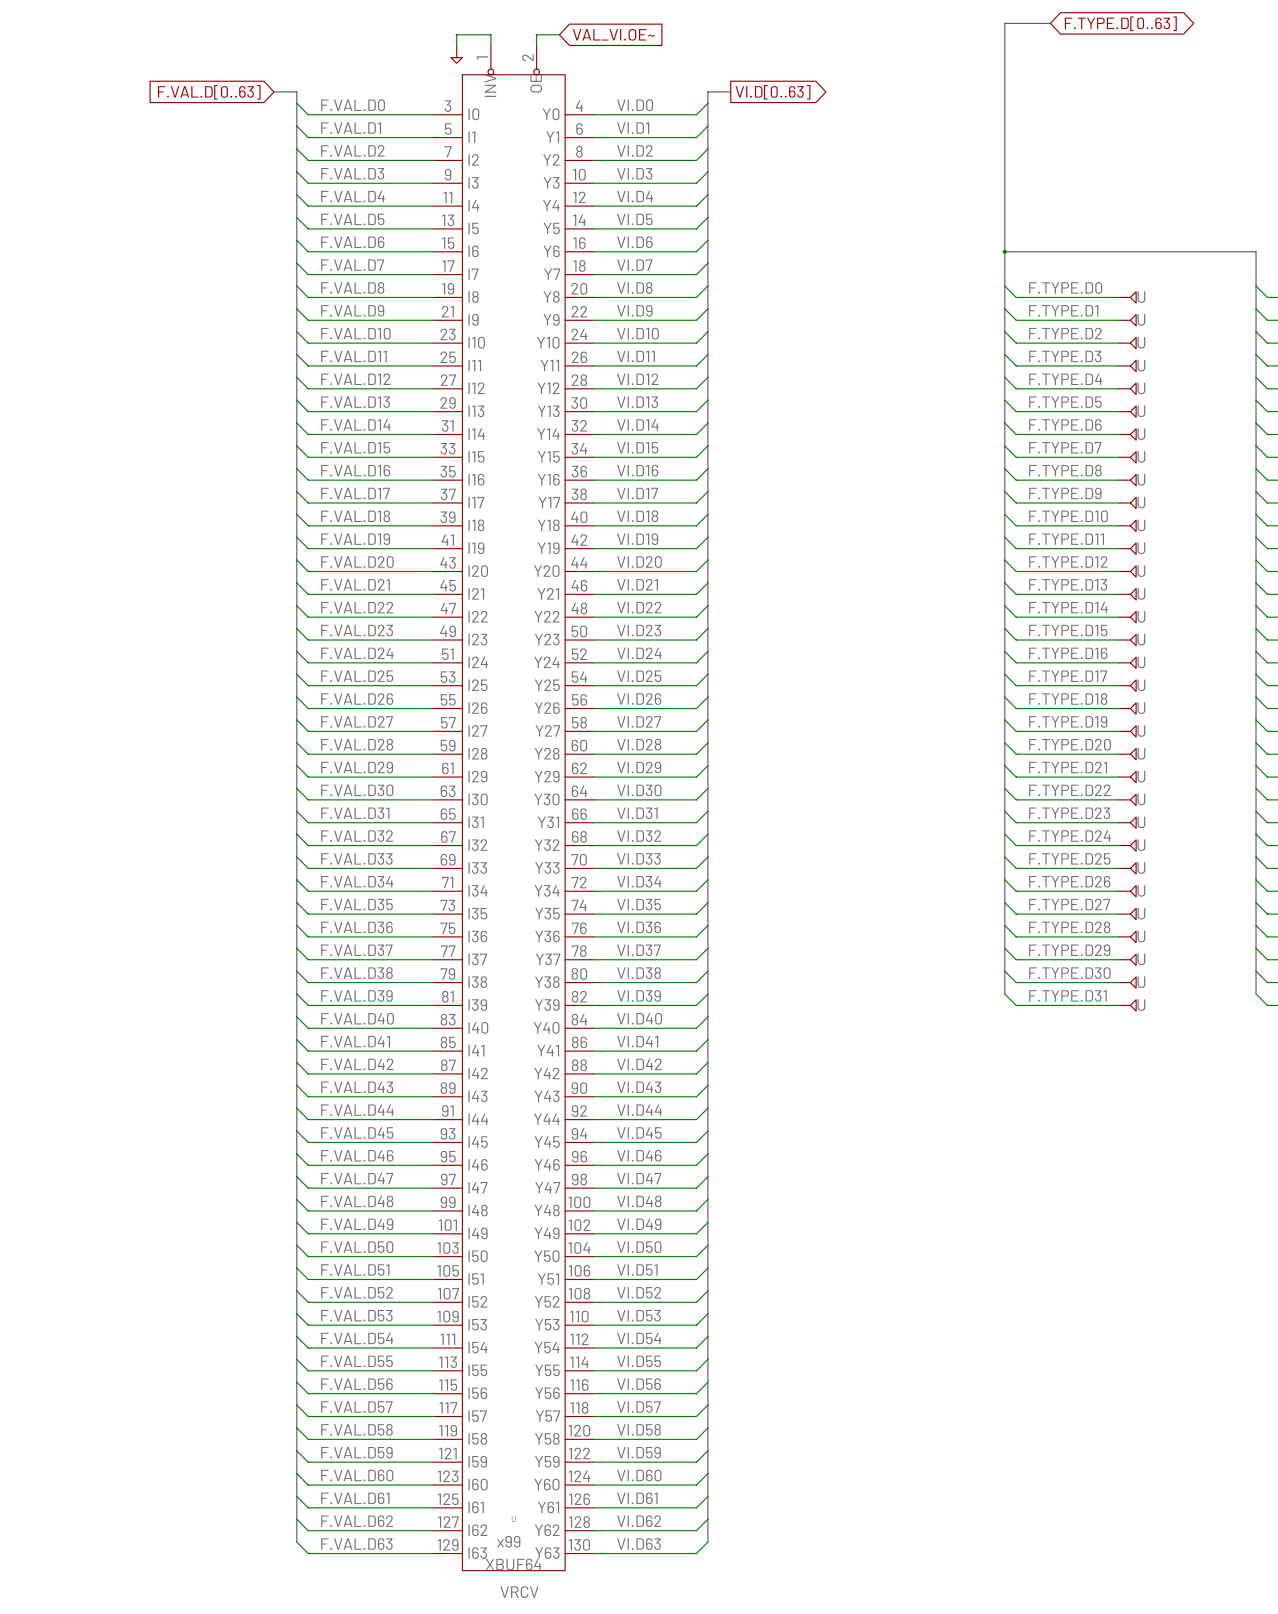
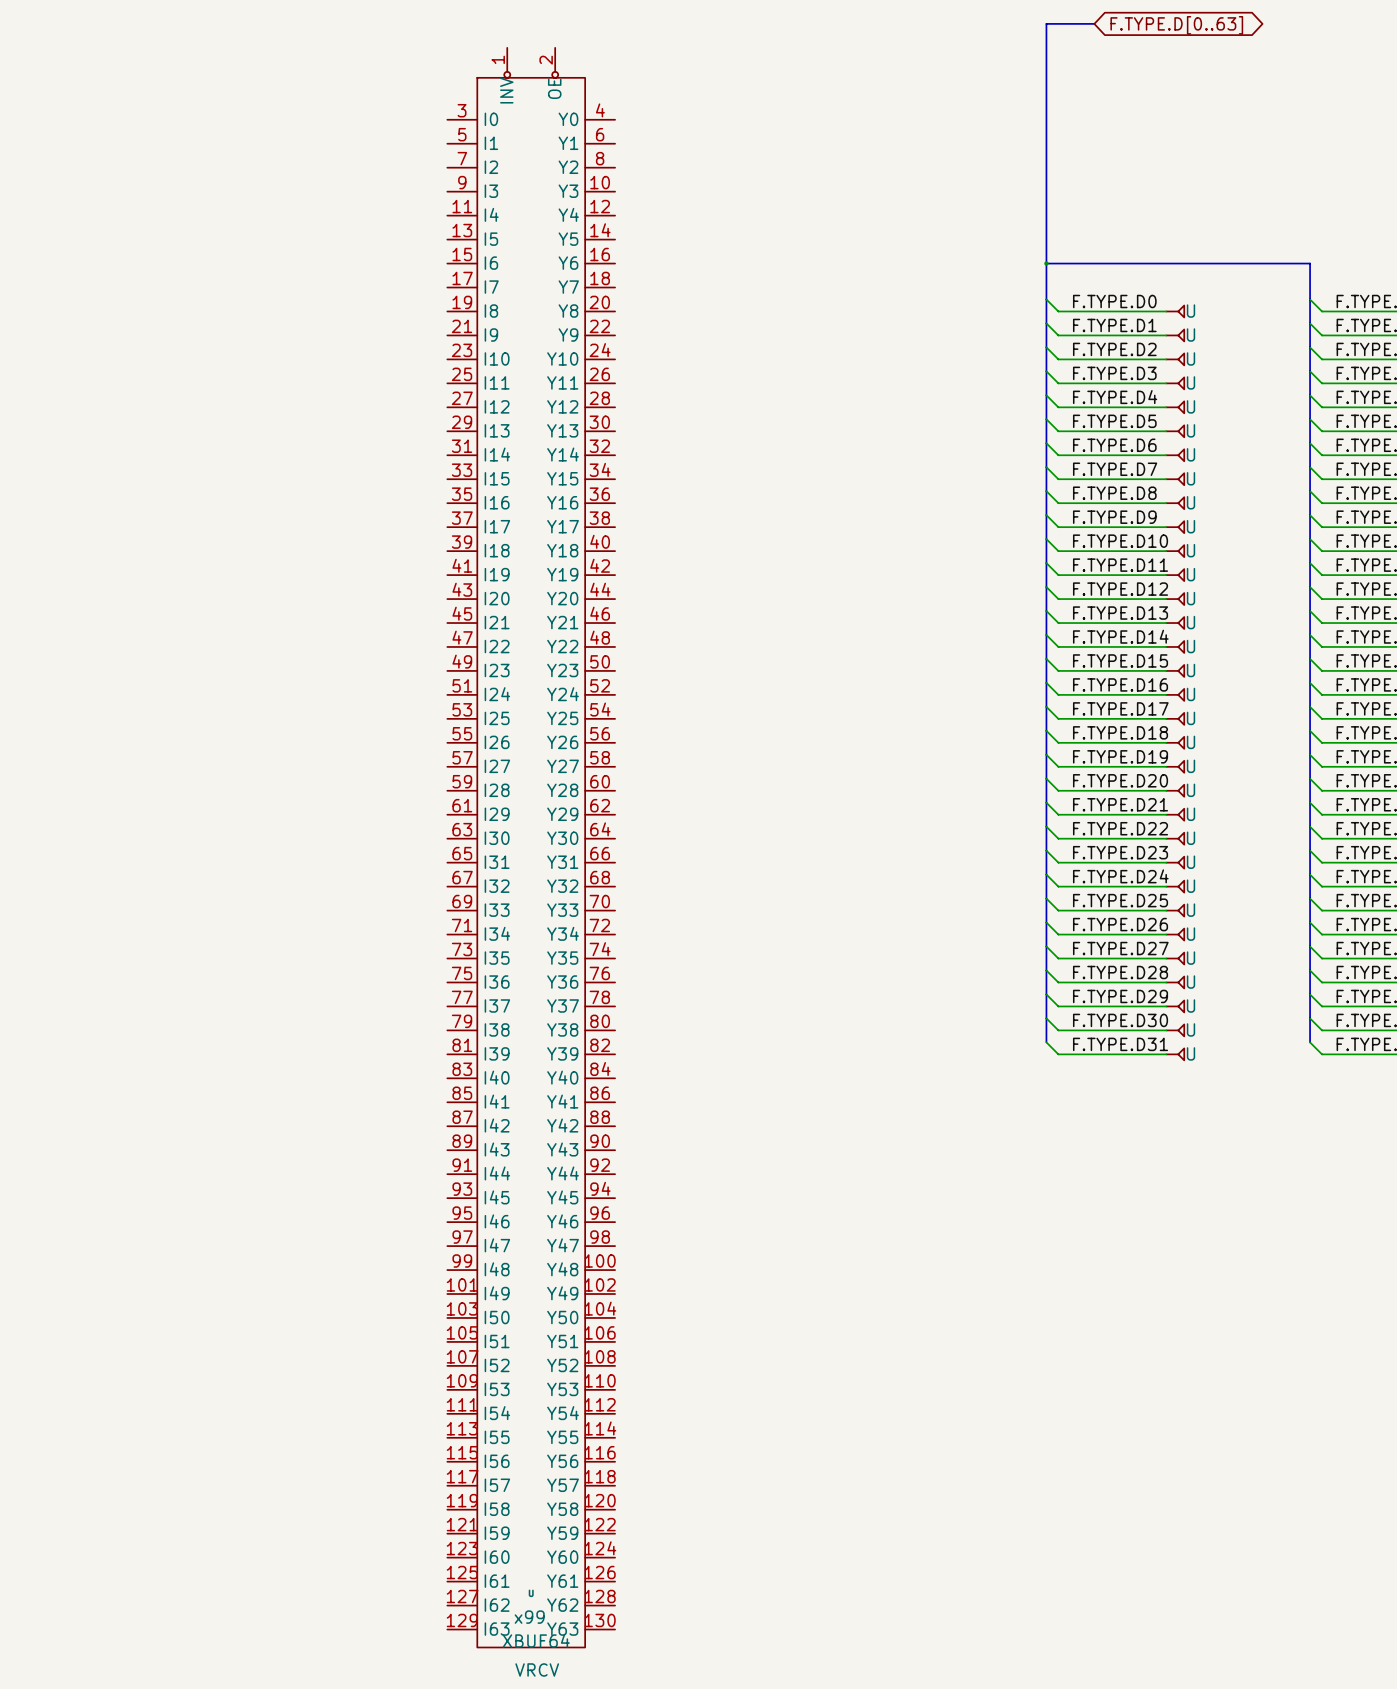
wire: (559, 34) (536, 34) (536, 46) -> none
global label: VAL_VI.OE~ (613, 34) -> none
wire: (456, 46) (456, 34) (490, 34) (490, 46) -> none
power symbol: (456, 54) -> none
bus: (273, 91) (296, 91) (296, 1542) -> none
bus: (730, 91) (707, 91) (707, 1542) -> none
global label: F.VAL.D[0..63] (209, 92) -> none
global label: VI.D[0..63] (773, 92) -> none
wire: (296, 103) (308, 114) (433, 114) -> none
wire: (707, 103) (696, 114) (593, 114) -> none
label: F.VAL.D0 (353, 105) -> none
label: VI.D0 (635, 105) -> none
wire: (296, 126) (308, 137) (433, 137) -> none
wire: (707, 126) (696, 137) (593, 137) -> none
label: F.VAL.D1 (351, 128) -> none
label: VI.D1 (633, 128) -> none
wire: (296, 148) (308, 160) (433, 160) -> none
wire: (707, 148) (696, 160) (593, 160) -> none
label: F.VAL.D2 (352, 150) -> none
label: VI.D2 (634, 150) -> none
wire: (296, 171) (308, 183) (433, 183) -> none
wire: (707, 171) (696, 183) (593, 183) -> none
label: F.VAL.D3 (352, 173) -> none
label: VI.D3 (634, 173) -> none
wire: (296, 194) (308, 206) (433, 206) -> none
wire: (707, 194) (696, 206) (593, 206) -> none
label: F.VAL.D4 (353, 196) -> none
label: VI.D4 (635, 196) -> none
wire: (296, 217) (308, 228) (433, 228) -> none
wire: (707, 217) (696, 228) (593, 228) -> none
label: F.VAL.D5 (352, 219) -> none
label: VI.D5 (634, 219) -> none
wire: (296, 240) (308, 251) (433, 251) -> none
wire: (707, 240) (696, 251) (593, 251) -> none
label: F.VAL.D6 (352, 242) -> none
label: VI.D6 (634, 242) -> none
wire: (296, 263) (308, 274) (433, 274) -> none
wire: (707, 263) (696, 274) (593, 274) -> none
label: F.VAL.D7 (352, 265) -> none
label: VI.D7 (634, 265) -> none
wire: (296, 286) (308, 297) (433, 297) -> none
wire: (707, 286) (696, 297) (593, 297) -> none
label: F.VAL.D8 (352, 287) -> none
label: VI.D8 (634, 287) -> none
wire: (296, 308) (308, 320) (433, 320) -> none
wire: (707, 308) (696, 320) (593, 320) -> none
label: F.VAL.D9 (352, 310) -> none
label: VI.D9 (634, 310) -> none
wire: (296, 331) (308, 343) (433, 343) -> none
wire: (707, 331) (696, 343) (593, 343) -> none
label: F.VAL.D10 (355, 333) -> none
label: VI.D10 (637, 333) -> none
wire: (296, 354) (308, 365) (433, 365) -> none
wire: (707, 354) (696, 365) (593, 365) -> none
label: F.VAL.D11 (353, 356) -> none
label: VI.D11 (636, 356) -> none
wire: (296, 377) (308, 388) (433, 388) -> none
wire: (707, 377) (696, 388) (593, 388) -> none
label: F.VAL.D12 (355, 379) -> none
label: VI.D12 (637, 379) -> none
wire: (296, 400) (308, 411) (433, 411) -> none
wire: (707, 400) (696, 411) (593, 411) -> none
label: F.VAL.D13 (355, 402) -> none
label: VI.D13 (637, 402) -> none
wire: (296, 423) (308, 434) (433, 434) -> none
wire: (707, 423) (696, 434) (593, 434) -> none
label: F.VAL.D14 (355, 424) -> none
label: VI.D14 (637, 424) -> none
wire: (296, 445) (308, 457) (433, 457) -> none
wire: (707, 445) (696, 457) (593, 457) -> none
label: F.VAL.D15 (355, 447) -> none
label: VI.D15 (637, 447) -> none
wire: (296, 468) (308, 480) (433, 480) -> none
wire: (707, 468) (696, 480) (593, 480) -> none
label: F.VAL.D16 (355, 470) -> none
label: VI.D16 (637, 470) -> none
wire: (296, 491) (308, 502) (433, 502) -> none
wire: (707, 491) (696, 502) (593, 502) -> none
label: F.VAL.D17 (355, 493) -> none
label: VI.D17 (637, 493) -> none
wire: (296, 514) (308, 525) (433, 525) -> none
wire: (707, 514) (696, 525) (593, 525) -> none
label: F.VAL.D18 (355, 516) -> none
label: VI.D18 (637, 516) -> none
wire: (296, 537) (308, 548) (433, 548) -> none
wire: (707, 537) (696, 548) (593, 548) -> none
label: F.VAL.D19 (355, 539) -> none
label: VI.D19 (637, 539) -> none
wire: (296, 560) (308, 571) (433, 571) -> none
wire: (707, 560) (696, 571) (593, 571) -> none
label: F.VAL.D20 (357, 562) -> none
label: VI.D20 (639, 562) -> none
wire: (296, 582) (308, 594) (433, 594) -> none
wire: (707, 582) (696, 594) (593, 594) -> none
label: F.VAL.D21 (355, 584) -> none
label: VI.D21 (637, 584) -> none
wire: (296, 605) (308, 617) (433, 617) -> none
wire: (707, 605) (696, 617) (593, 617) -> none
label: F.VAL.D22 (357, 607) -> none
label: VI.D22 (639, 607) -> none
wire: (296, 628) (308, 640) (433, 640) -> none
wire: (707, 628) (696, 640) (593, 640) -> none
label: F.VAL.D23 (357, 630) -> none
label: VI.D23 (639, 630) -> none
wire: (296, 651) (308, 662) (433, 662) -> none
wire: (707, 651) (696, 662) (593, 662) -> none
label: F.VAL.D24 (357, 653) -> none
label: VI.D24 (639, 653) -> none
wire: (296, 674) (308, 685) (433, 685) -> none
wire: (707, 674) (696, 685) (593, 685) -> none
label: F.VAL.D25 (357, 676) -> none
label: VI.D25 (639, 676) -> none
wire: (296, 697) (308, 708) (433, 708) -> none
wire: (707, 697) (696, 708) (593, 708) -> none
label: F.VAL.D26 (357, 699) -> none
label: VI.D26 (639, 699) -> none
wire: (296, 719) (308, 731) (433, 731) -> none
wire: (707, 719) (696, 731) (593, 731) -> none
label: F.VAL.D27 (357, 721) -> none
label: VI.D27 (639, 721) -> none
wire: (296, 742) (308, 754) (433, 754) -> none
wire: (707, 742) (696, 754) (593, 754) -> none
label: F.VAL.D28 (357, 744) -> none
label: VI.D28 (639, 744) -> none
wire: (296, 765) (308, 777) (433, 777) -> none
wire: (707, 765) (696, 777) (593, 777) -> none
label: F.VAL.D29 (357, 767) -> none
label: VI.D29 (639, 767) -> none
wire: (296, 788) (308, 799) (433, 799) -> none
wire: (707, 788) (696, 799) (593, 799) -> none
label: F.VAL.D30 (357, 790) -> none
label: VI.D30 (639, 790) -> none
wire: (296, 811) (308, 822) (433, 822) -> none
wire: (707, 811) (696, 822) (593, 822) -> none
label: F.VAL.D31 (355, 813) -> none
label: VI.D31 (637, 813) -> none
wire: (296, 834) (308, 845) (433, 845) -> none
wire: (707, 834) (696, 845) (593, 845) -> none
label: F.VAL.D32 (357, 836) -> none
label: VI.D32 (639, 836) -> none
wire: (296, 856) (308, 868) (433, 868) -> none
wire: (707, 856) (696, 868) (593, 868) -> none
label: F.VAL.D33 (356, 858) -> none
label: VI.D33 (638, 858) -> none
wire: (296, 879) (308, 891) (433, 891) -> none
wire: (707, 879) (696, 891) (593, 891) -> none
label: F.VAL.D34 (357, 881) -> none
label: VI.D34 (639, 881) -> none
wire: (296, 902) (308, 914) (433, 914) -> none
wire: (707, 902) (696, 914) (593, 914) -> none
label: F.VAL.D35 (357, 904) -> none
label: VI.D35 (639, 904) -> none
wire: (296, 925) (308, 936) (433, 936) -> none
wire: (707, 925) (696, 936) (593, 936) -> none
label: F.VAL.D36 (357, 927) -> none
label: VI.D36 (639, 927) -> none
wire: (296, 948) (308, 959) (433, 959) -> none
wire: (707, 948) (696, 959) (593, 959) -> none
label: F.VAL.D37 (356, 950) -> none
label: VI.D37 (638, 950) -> none
wire: (296, 971) (308, 982) (433, 982) -> none
wire: (707, 971) (696, 982) (593, 982) -> none
label: F.VAL.D38 (356, 973) -> none
label: VI.D38 (639, 973) -> none
wire: (296, 994) (308, 1005) (433, 1005) -> none
wire: (707, 994) (696, 1005) (593, 1005) -> none
label: F.VAL.D39 (356, 995) -> none
label: VI.D39 (638, 995) -> none
wire: (296, 1016) (308, 1028) (433, 1028) -> none
wire: (707, 1016) (696, 1028) (593, 1028) -> none
label: F.VAL.D40 (357, 1018) -> none
label: VI.D40 (639, 1018) -> none
wire: (296, 1039) (308, 1051) (433, 1051) -> none
wire: (707, 1039) (696, 1051) (593, 1051) -> none
label: F.VAL.D41 (355, 1041) -> none
label: VI.D41 (637, 1041) -> none
wire: (296, 1062) (308, 1073) (433, 1073) -> none
wire: (707, 1062) (696, 1073) (593, 1073) -> none
label: F.VAL.D42 (357, 1064) -> none
label: VI.D42 (639, 1064) -> none
wire: (296, 1085) (308, 1096) (433, 1096) -> none
wire: (707, 1085) (696, 1096) (593, 1096) -> none
label: F.VAL.D43 (357, 1087) -> none
label: VI.D43 (639, 1087) -> none
wire: (296, 1108) (308, 1119) (433, 1119) -> none
wire: (707, 1108) (696, 1119) (593, 1119) -> none
label: F.VAL.D44 (357, 1110) -> none
label: VI.D44 (639, 1110) -> none
wire: (296, 1131) (308, 1142) (433, 1142) -> none
wire: (707, 1131) (696, 1142) (593, 1142) -> none
label: F.VAL.D45 (357, 1133) -> none
label: VI.D45 (639, 1133) -> none
wire: (296, 1153) (308, 1165) (433, 1165) -> none
wire: (707, 1153) (696, 1165) (593, 1165) -> none
label: F.VAL.D46 (357, 1155) -> none
label: VI.D46 (639, 1155) -> none
wire: (296, 1176) (308, 1188) (433, 1188) -> none
wire: (707, 1176) (696, 1188) (593, 1188) -> none
label: F.VAL.D47 (357, 1178) -> none
label: VI.D47 (639, 1178) -> none
wire: (296, 1199) (308, 1210) (433, 1210) -> none
wire: (707, 1199) (696, 1210) (593, 1210) -> none
label: F.VAL.D48 (357, 1201) -> none
label: VI.D48 (639, 1201) -> none
wire: (296, 1222) (308, 1233) (433, 1233) -> none
wire: (707, 1222) (696, 1233) (593, 1233) -> none
label: F.VAL.D49 (357, 1224) -> none
label: VI.D49 (639, 1224) -> none
wire: (296, 1245) (308, 1256) (433, 1256) -> none
wire: (707, 1245) (696, 1256) (593, 1256) -> none
label: F.VAL.D50 (357, 1247) -> none
label: VI.D50 (639, 1247) -> none
wire: (296, 1268) (308, 1279) (433, 1279) -> none
wire: (707, 1268) (696, 1279) (593, 1279) -> none
label: F.VAL.D51 (355, 1270) -> none
label: VI.D51 (637, 1270) -> none
wire: (296, 1290) (308, 1302) (433, 1302) -> none
wire: (707, 1290) (696, 1302) (593, 1302) -> none
label: F.VAL.D52 (357, 1292) -> none
label: VI.D52 (639, 1292) -> none
wire: (296, 1313) (308, 1325) (433, 1325) -> none
wire: (707, 1313) (696, 1325) (593, 1325) -> none
label: F.VAL.D53 (356, 1315) -> none
label: VI.D53 (638, 1315) -> none
wire: (296, 1336) (308, 1347) (433, 1347) -> none
wire: (707, 1336) (696, 1347) (593, 1347) -> none
label: F.VAL.D54 (357, 1338) -> none
label: VI.D54 (639, 1338) -> none
wire: (296, 1359) (308, 1370) (433, 1370) -> none
wire: (707, 1359) (696, 1370) (593, 1370) -> none
label: F.VAL.D55 (356, 1361) -> none
label: VI.D55 (639, 1361) -> none
wire: (296, 1382) (308, 1393) (433, 1393) -> none
wire: (707, 1382) (696, 1393) (593, 1393) -> none
label: F.VAL.D56 (357, 1384) -> none
label: VI.D56 (639, 1384) -> none
wire: (296, 1405) (308, 1416) (433, 1416) -> none
wire: (707, 1405) (696, 1416) (593, 1416) -> none
label: F.VAL.D57 (356, 1407) -> none
label: VI.D57 (638, 1407) -> none
wire: (296, 1427) (308, 1439) (433, 1439) -> none
wire: (707, 1427) (696, 1439) (593, 1439) -> none
label: F.VAL.D58 (356, 1429) -> none
label: VI.D58 (639, 1429) -> none
wire: (296, 1450) (308, 1462) (433, 1462) -> none
wire: (707, 1450) (696, 1462) (593, 1462) -> none
label: F.VAL.D59 (356, 1452) -> none
label: VI.D59 (638, 1452) -> none
wire: (296, 1473) (308, 1485) (433, 1485) -> none
wire: (707, 1473) (696, 1485) (593, 1485) -> none
label: F.VAL.D60 (357, 1475) -> none
label: VI.D60 (639, 1475) -> none
wire: (296, 1496) (308, 1507) (433, 1507) -> none
wire: (707, 1496) (696, 1507) (593, 1507) -> none
label: F.VAL.D61 (355, 1498) -> none
label: VI.D61 (637, 1498) -> none
wire: (296, 1519) (308, 1530) (433, 1530) -> none
wire: (707, 1519) (696, 1530) (593, 1530) -> none
label: F.VAL.D62 (357, 1521) -> none
label: VI.D62 (639, 1521) -> none
wire: (296, 1542) (308, 1553) (433, 1553) -> none
wire: (707, 1542) (696, 1553) (593, 1553) -> none
label: F.VAL.D63 (356, 1544) -> none
label: VI.D63 (638, 1544) -> none

